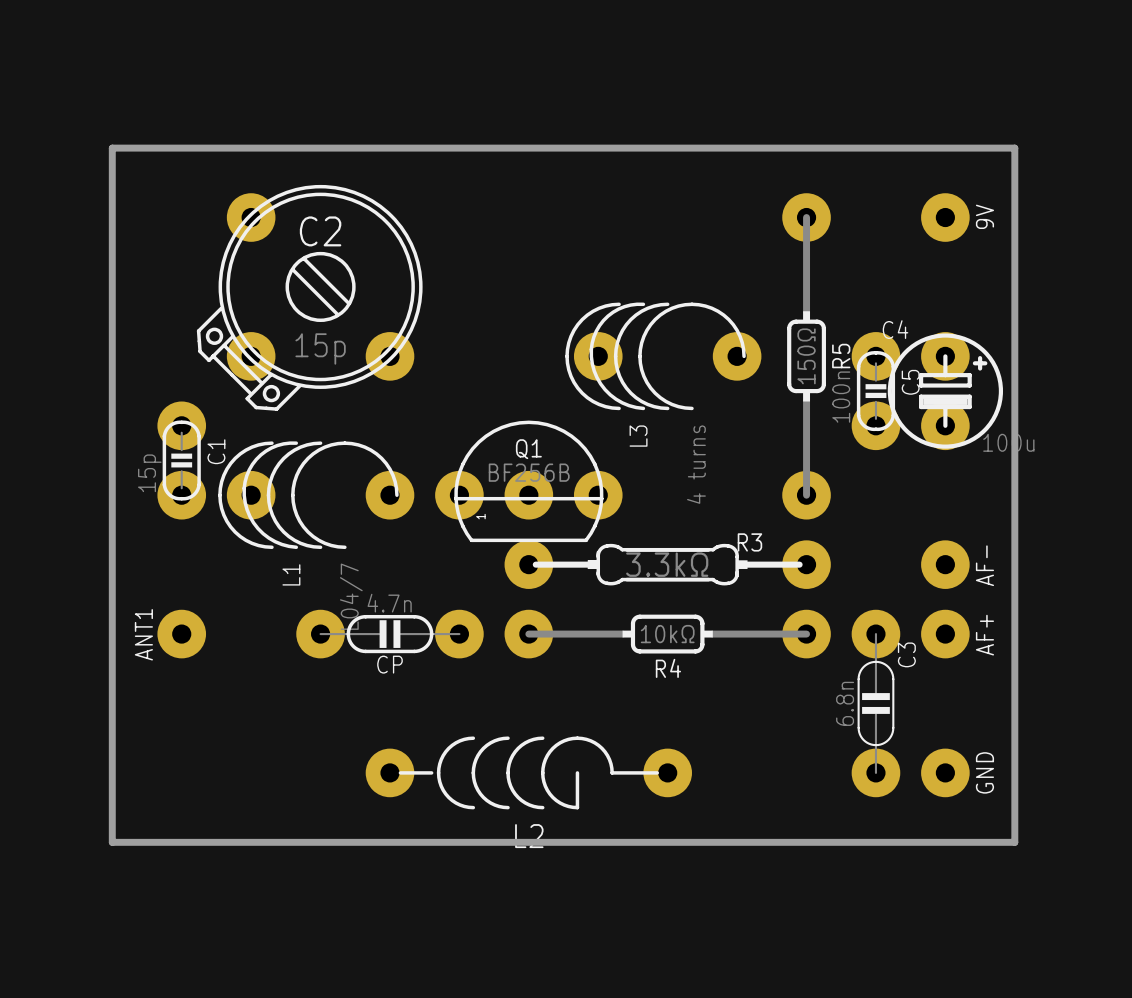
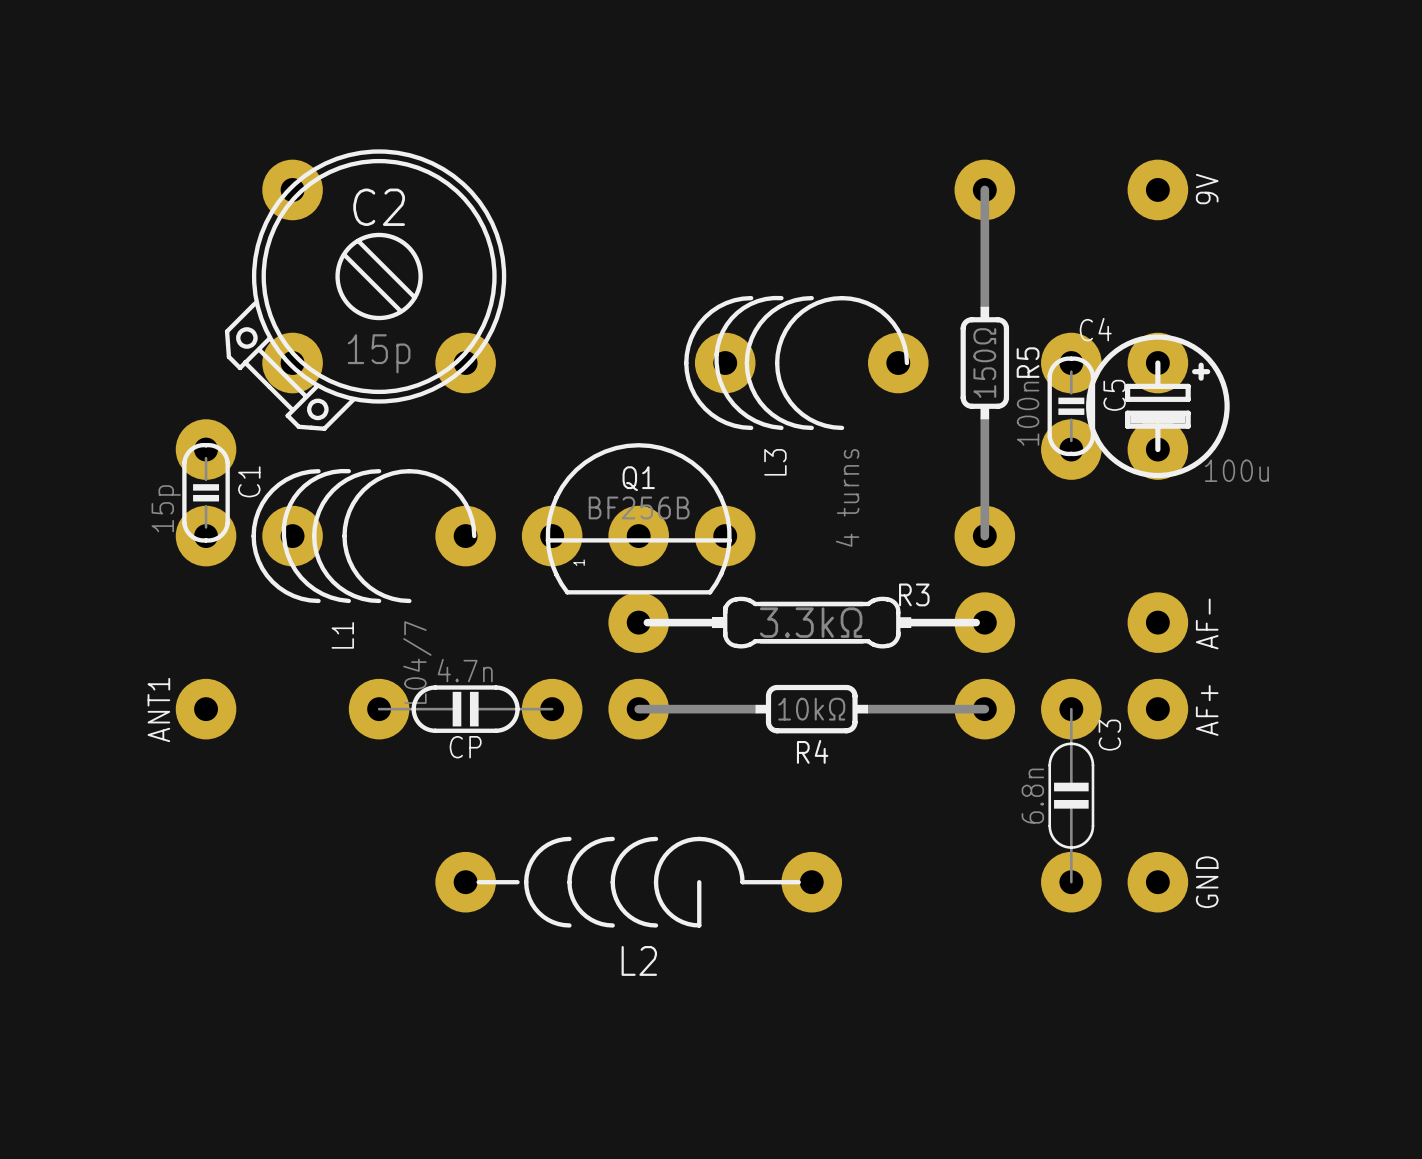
board edge: (112, 148) (1014, 148) (1014, 842) (112, 842) (112, 148) -> none

